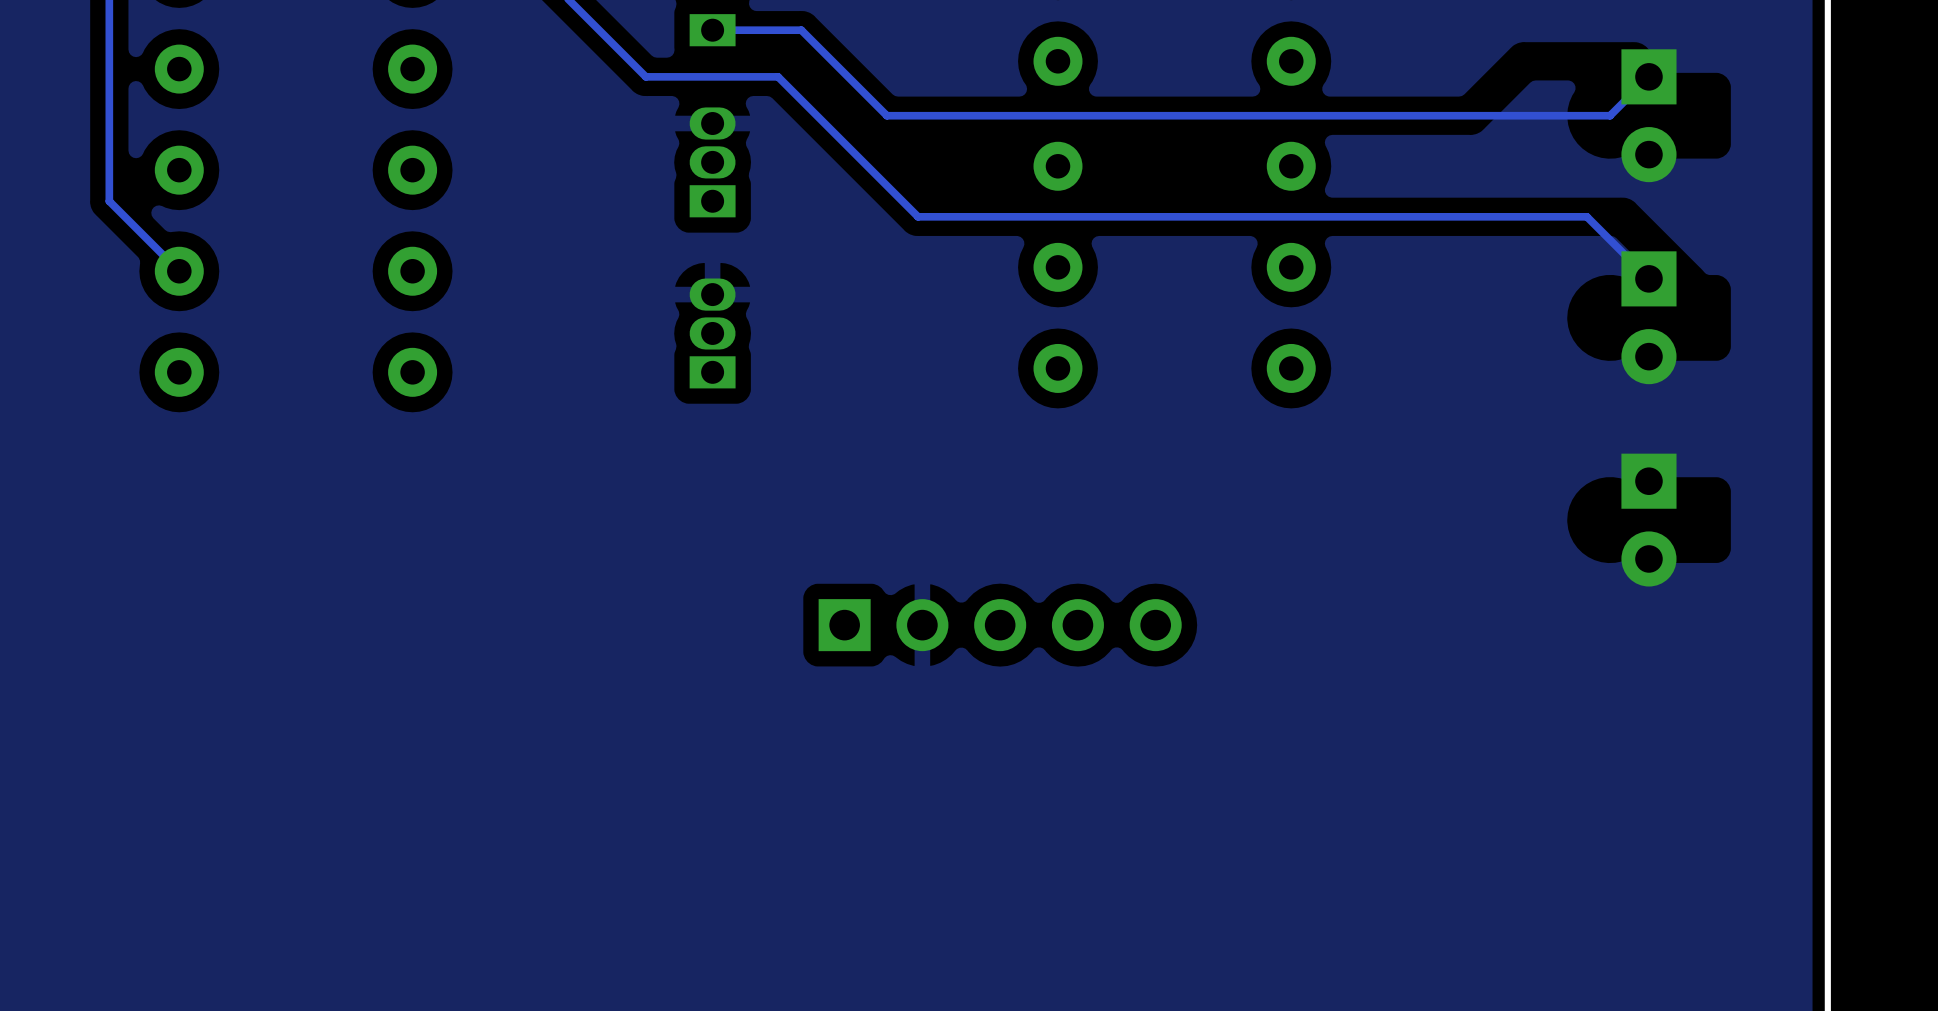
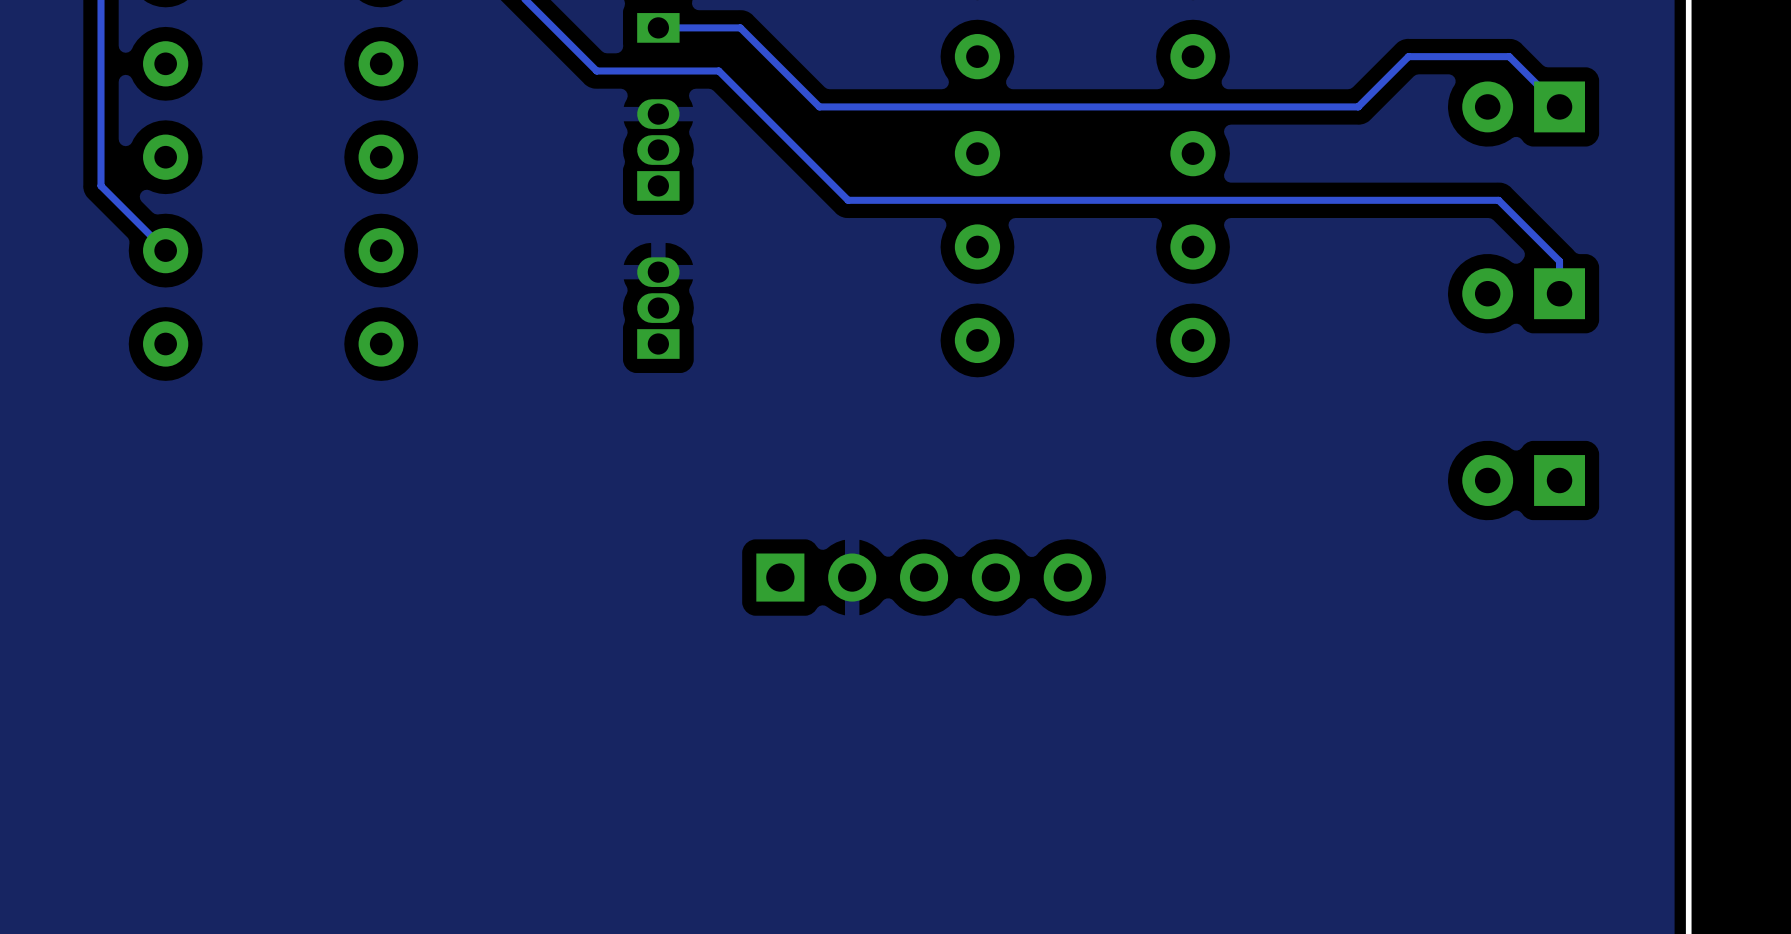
track: (1648, 76) (1610, 115) (1470, 115) -> (1559, 106) (1509, 56) (1408, 56) (1358, 106)
part rotation: 0° (1648, 115) -> 90° clockwise (1523, 106)
track: (1586, 216) (1648, 278) -> (1466, 200) (1498, 200) (1559, 261) (1559, 293)
part rotation: 0° (1648, 317) -> 90° clockwise (1523, 293)
part rotation: 0° (1648, 520) -> 90° clockwise (1523, 480)

